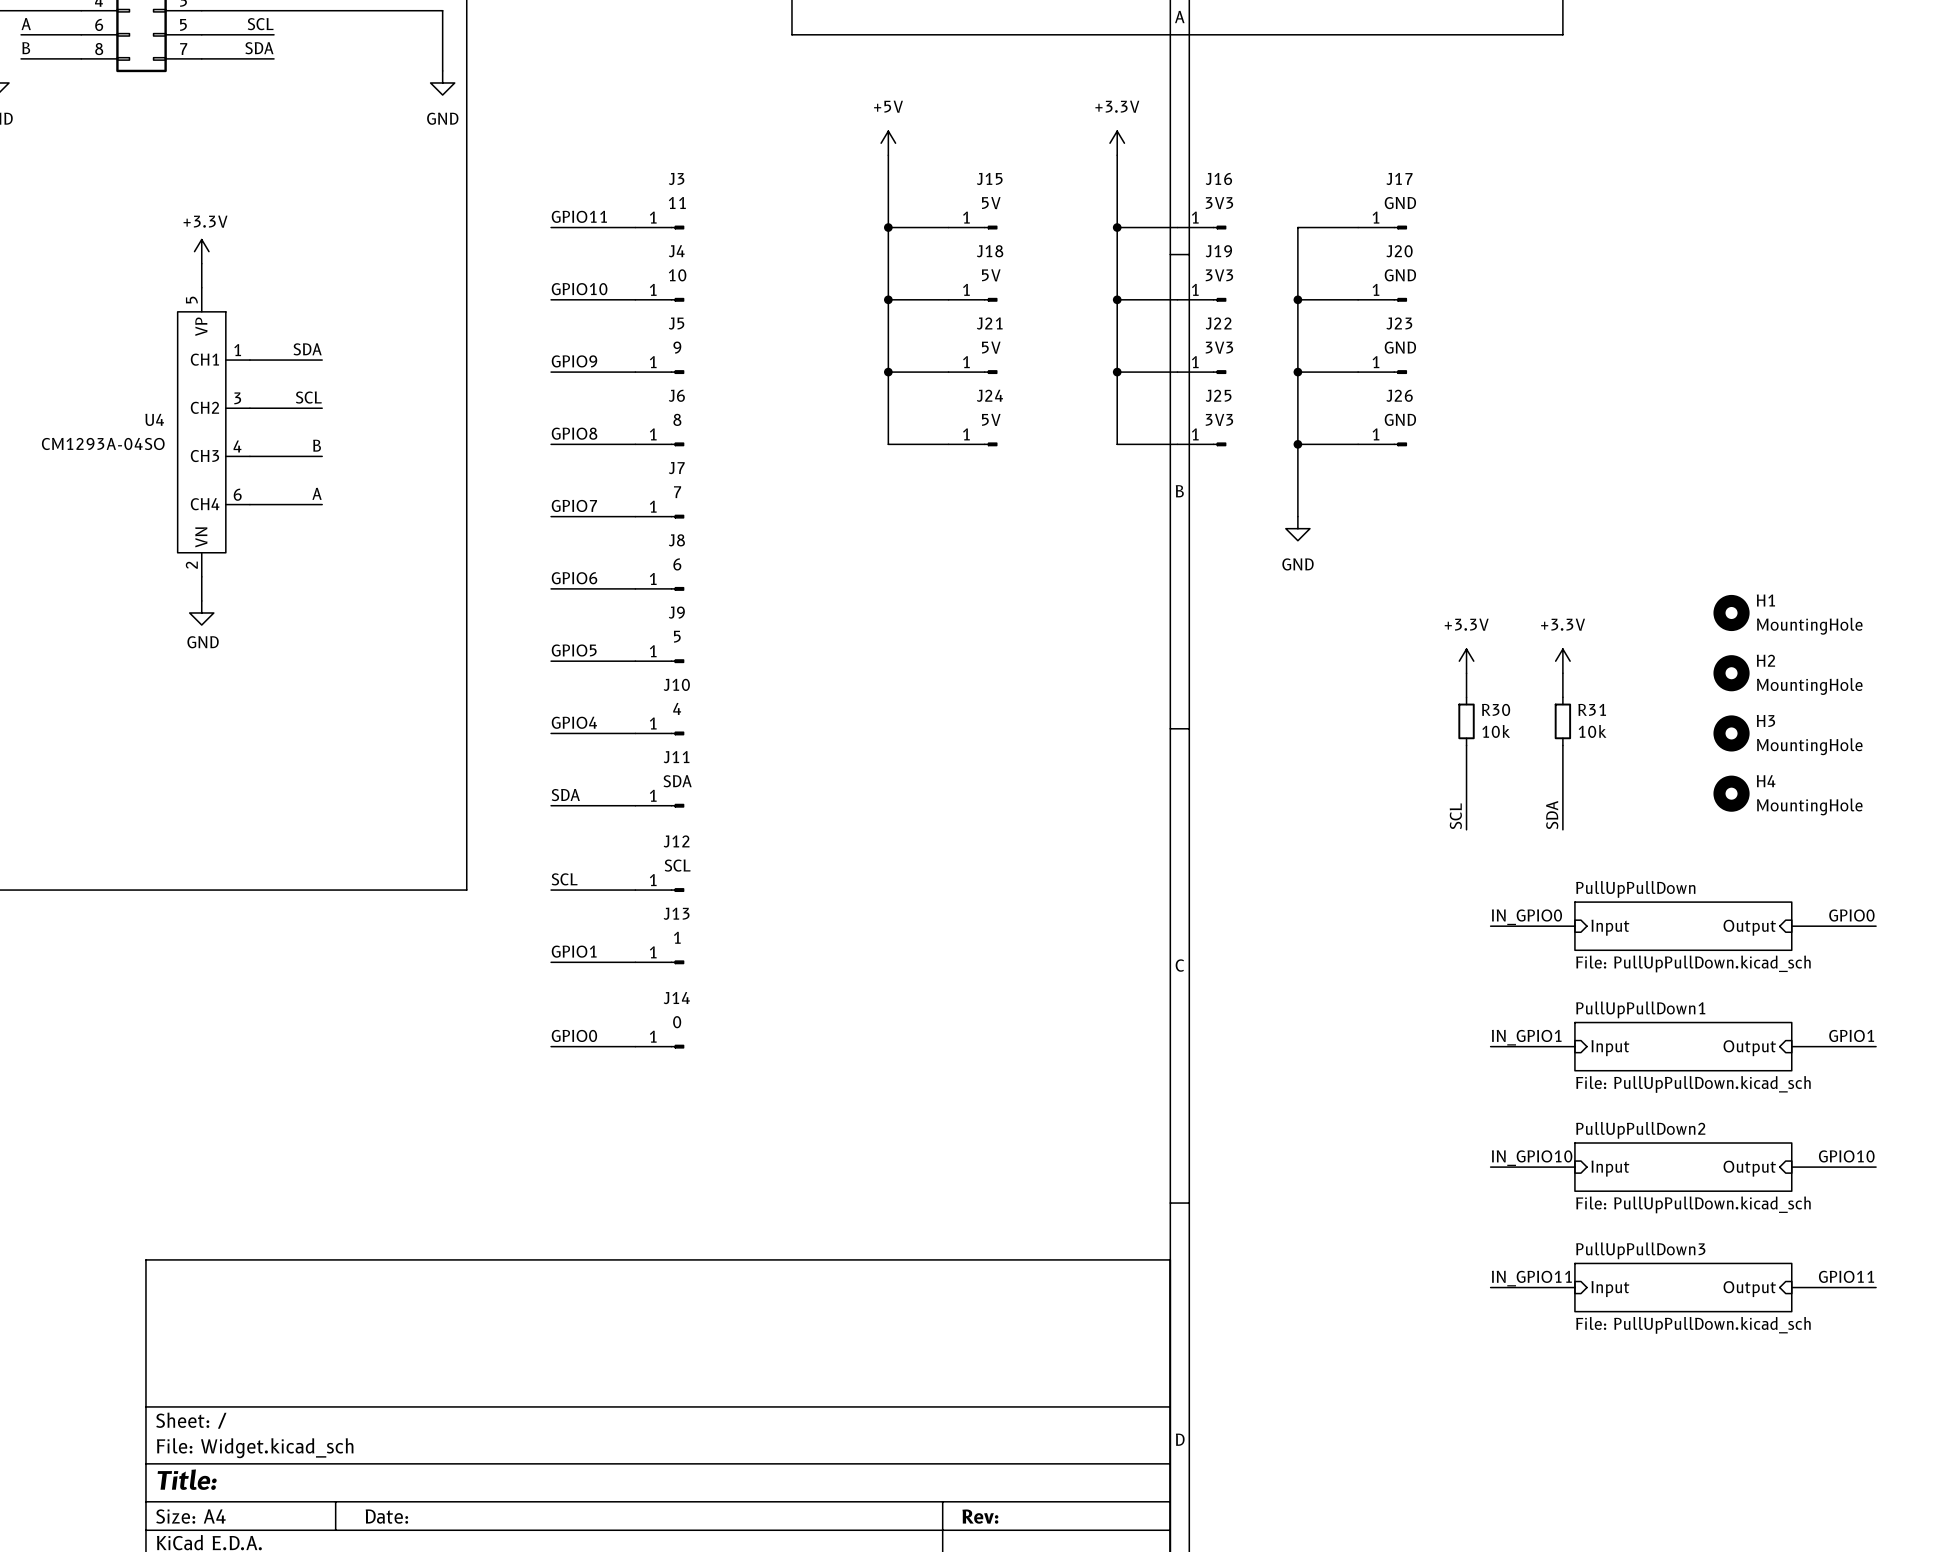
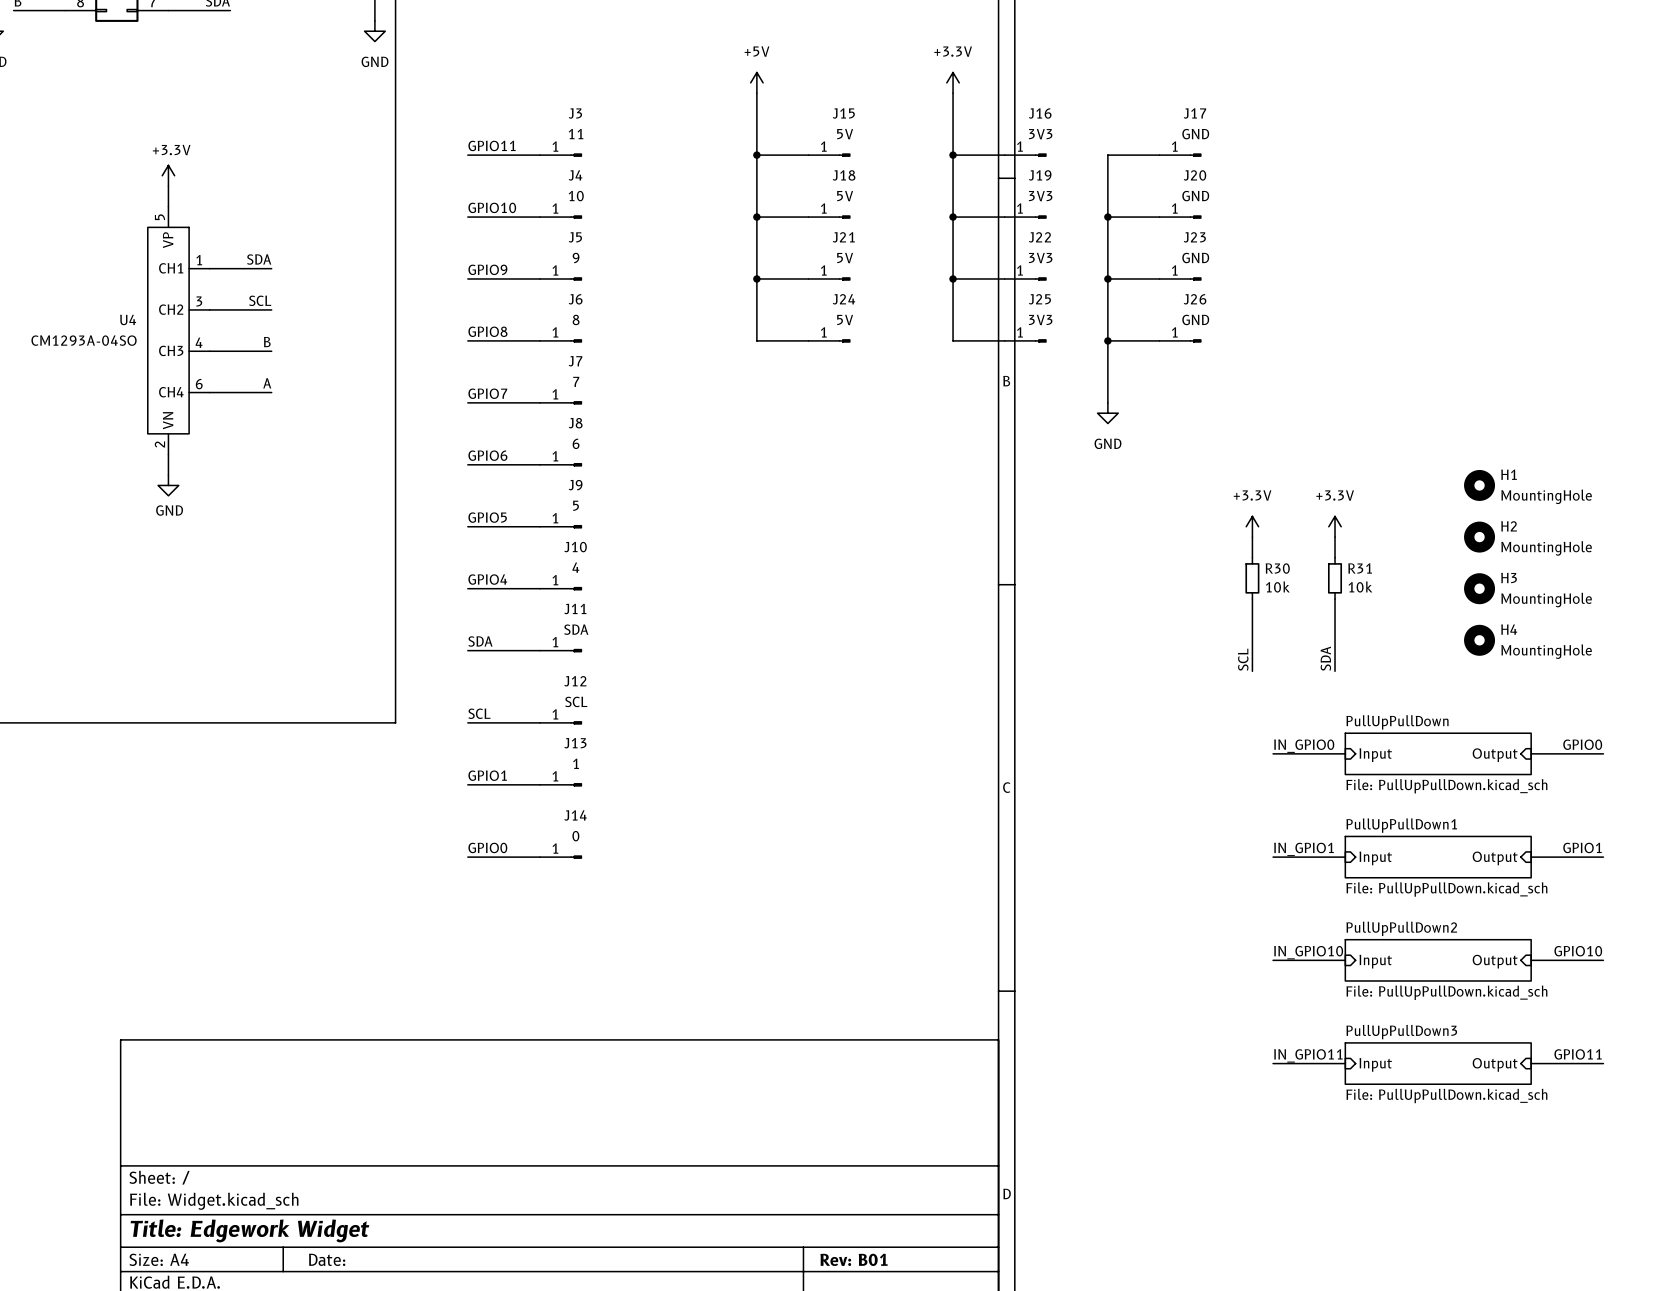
title block: Title: (187, 1479) -> Title: Edgework Widget (249, 1230)
title block: Rev: (980, 1516) -> Rev: B01 (854, 1259)

